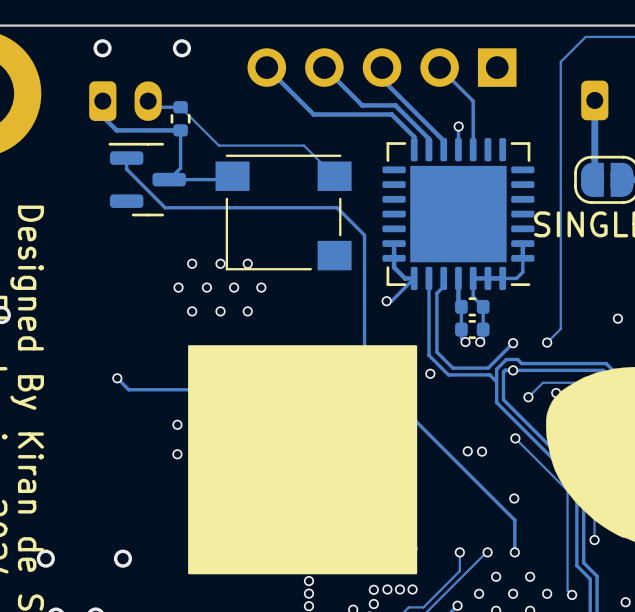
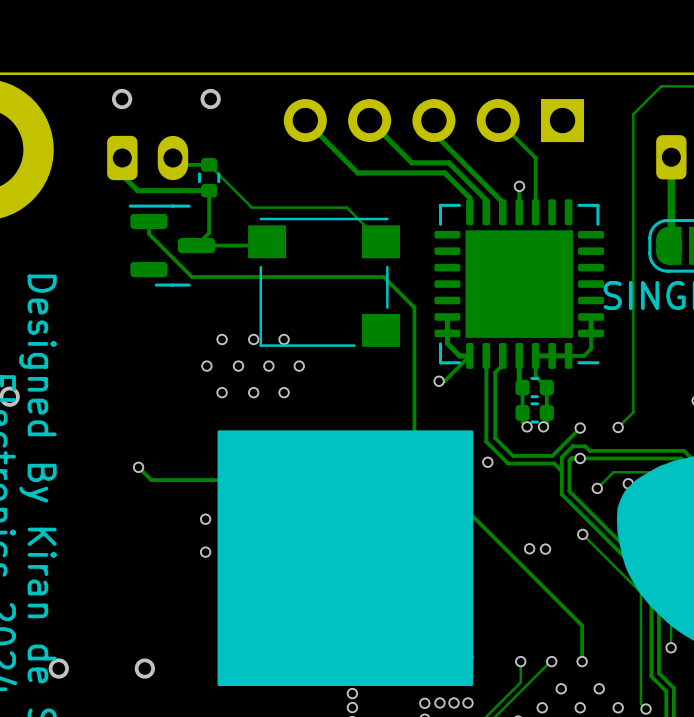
via: (514, 498) -> none

